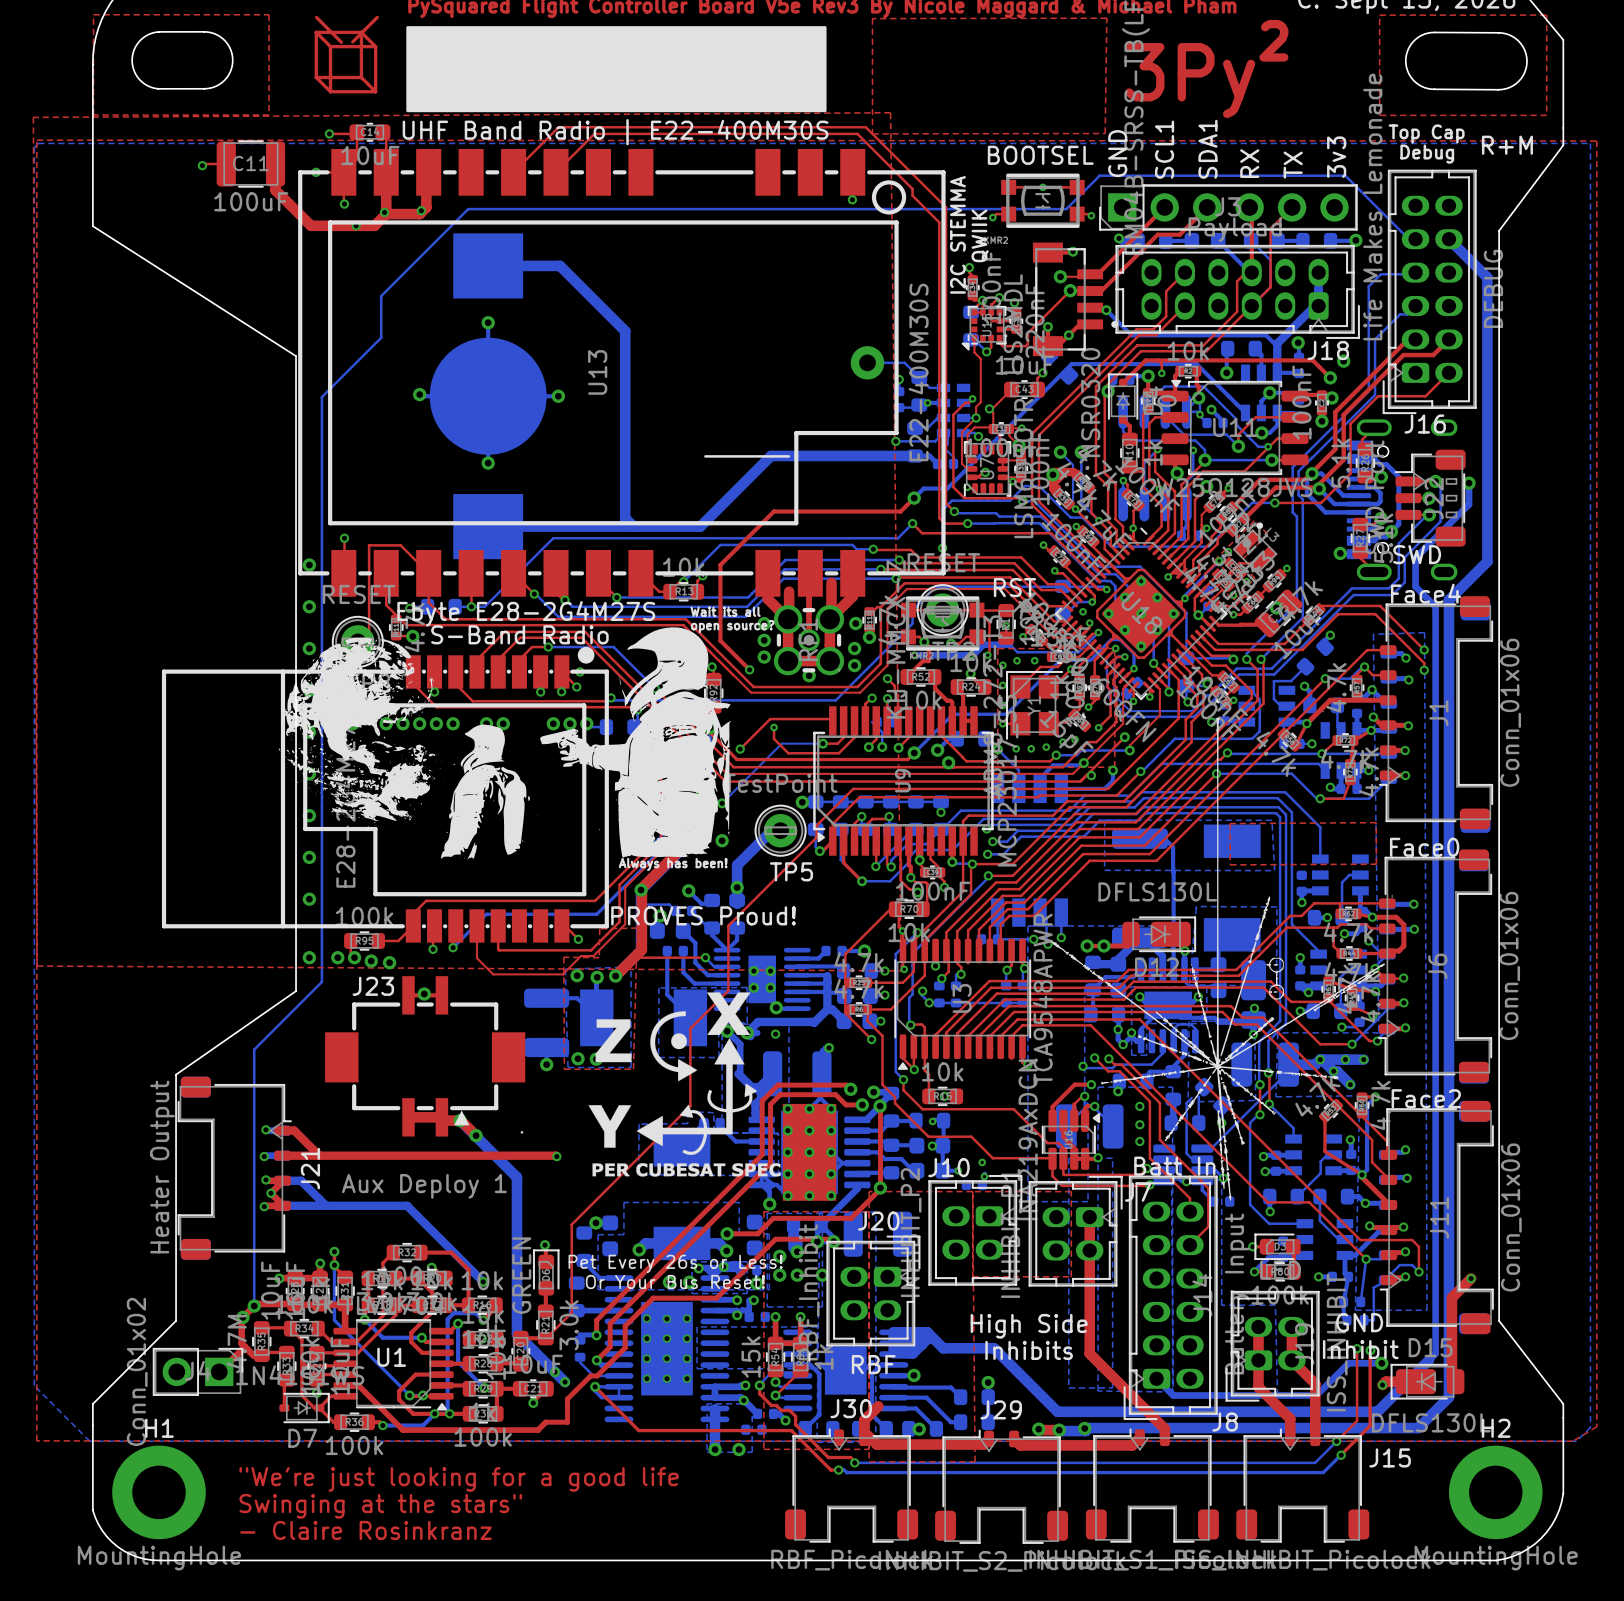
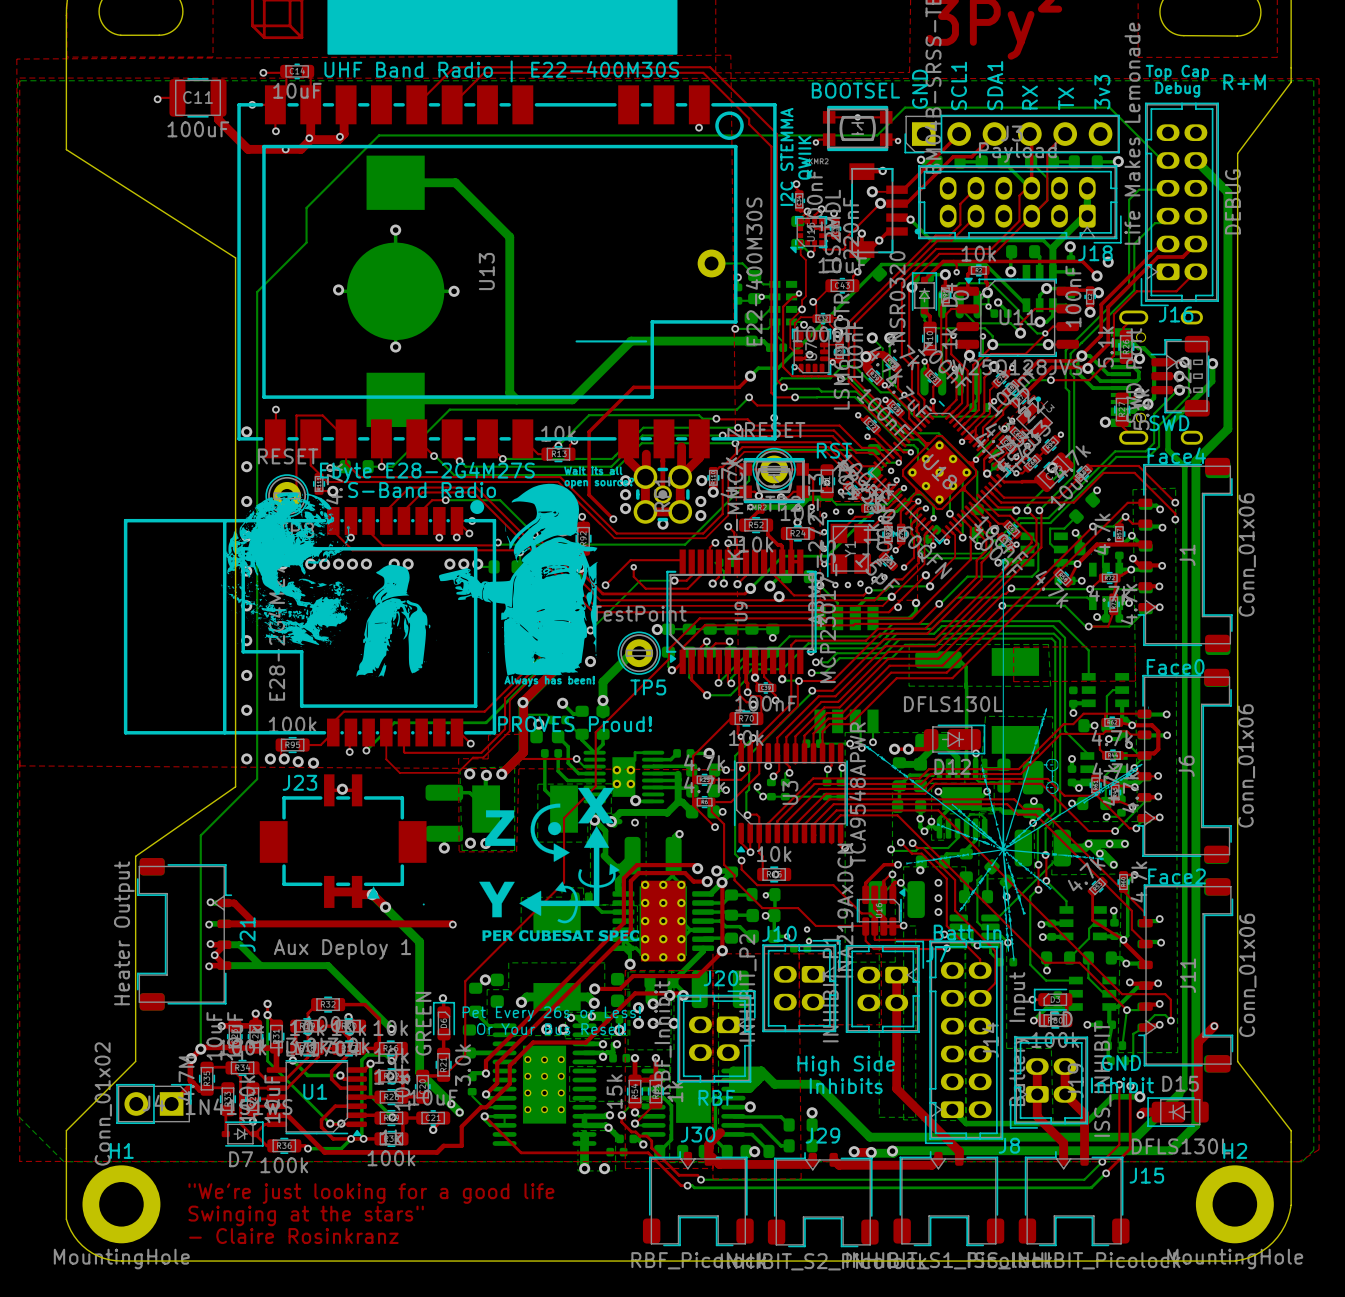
bottom track: none -> (644, 752) (635, 752) (635, 760)

